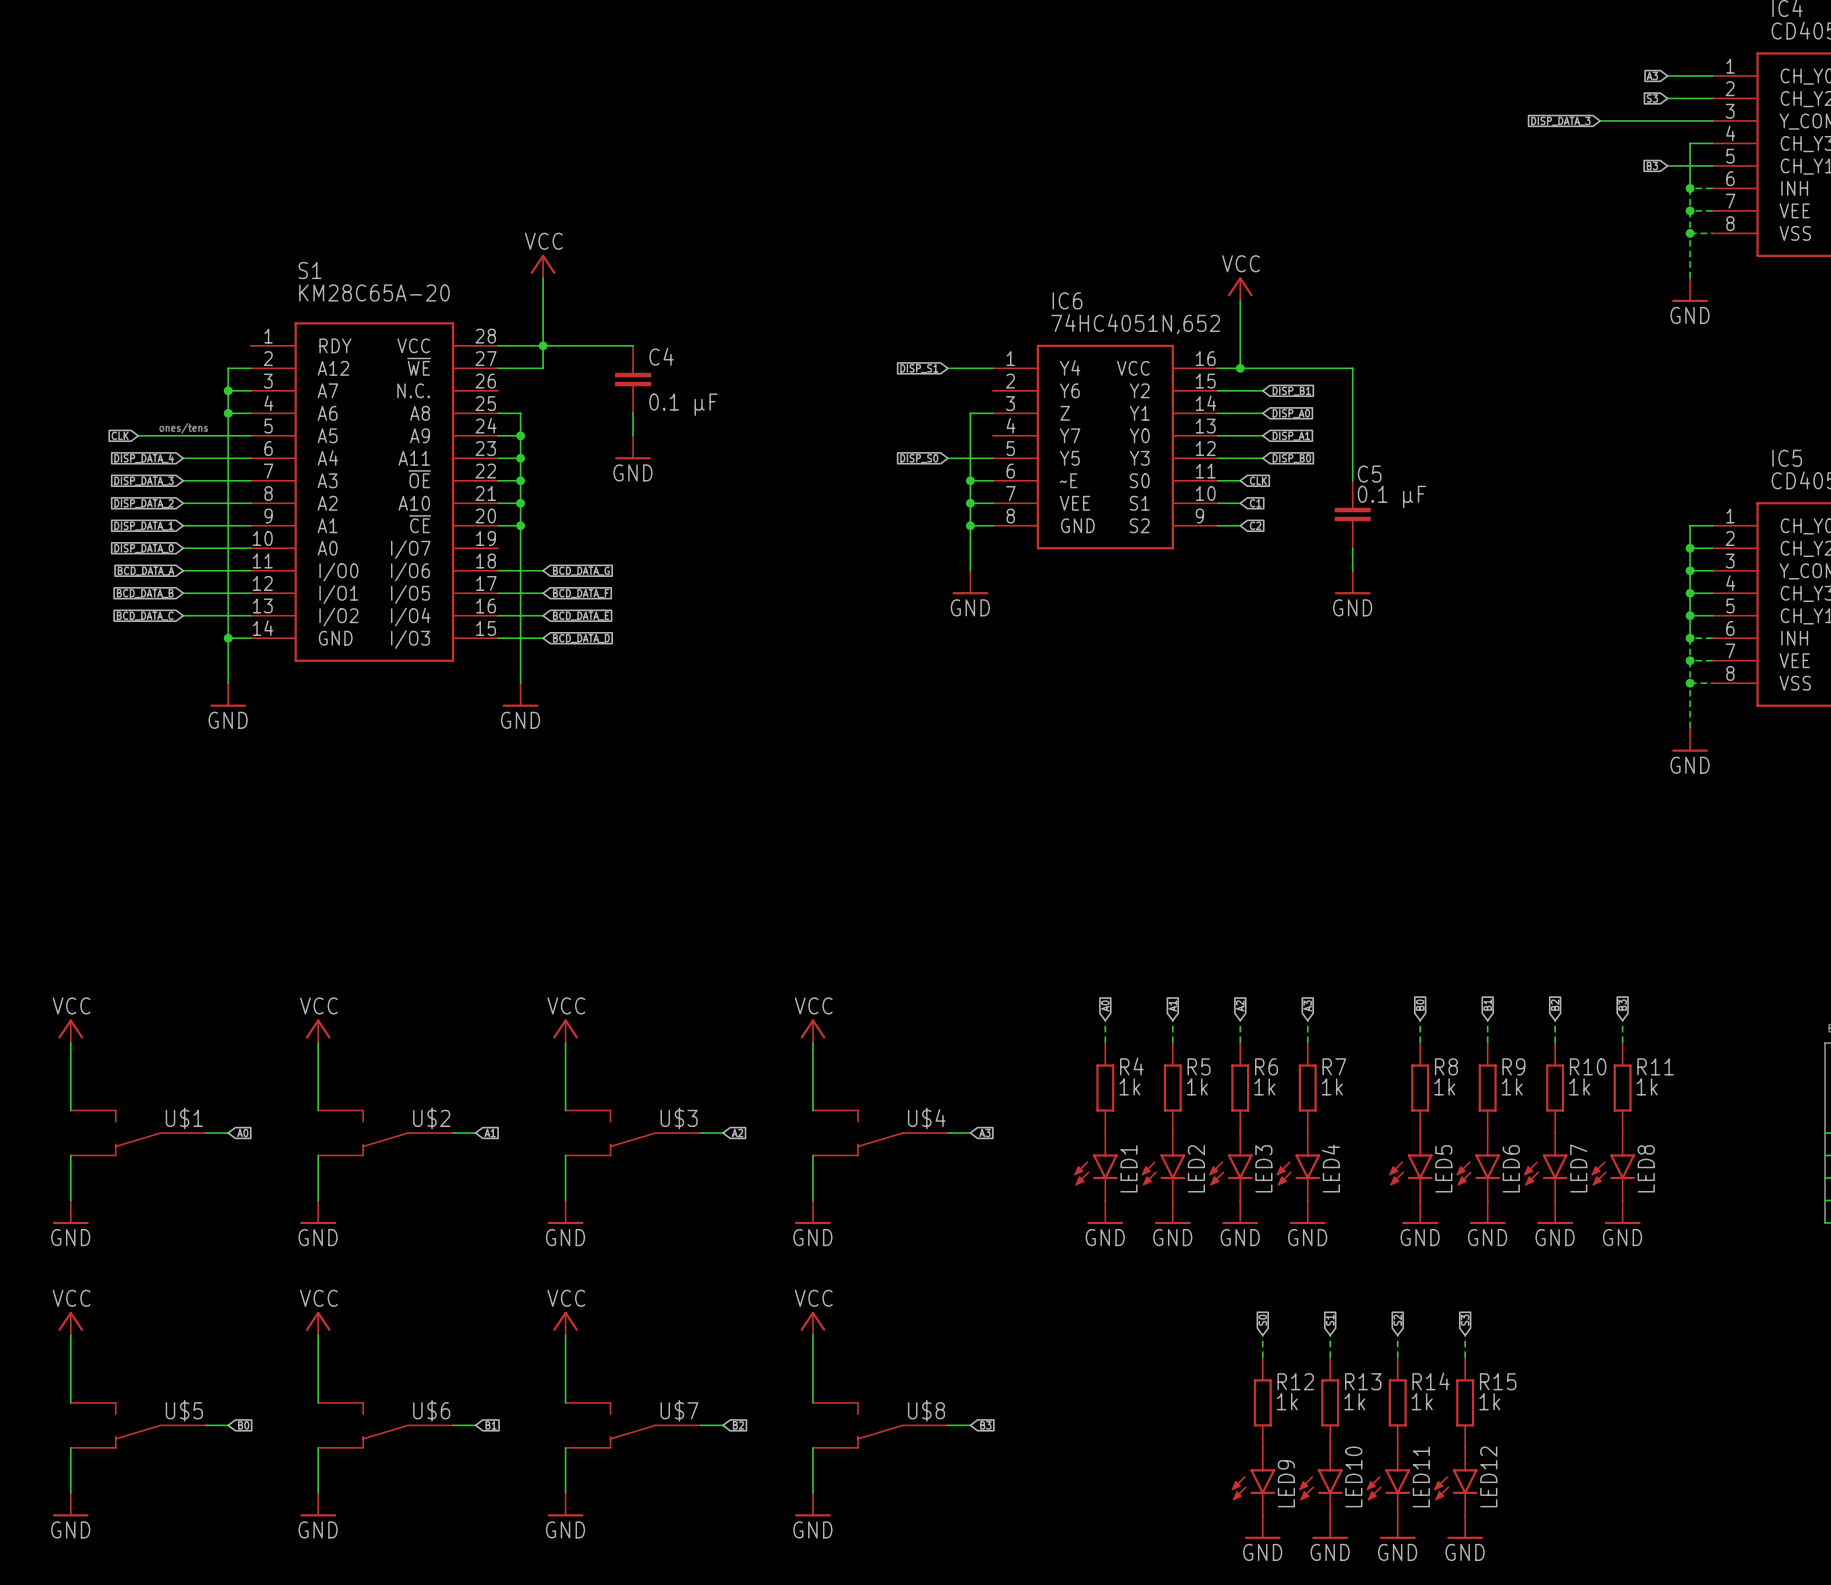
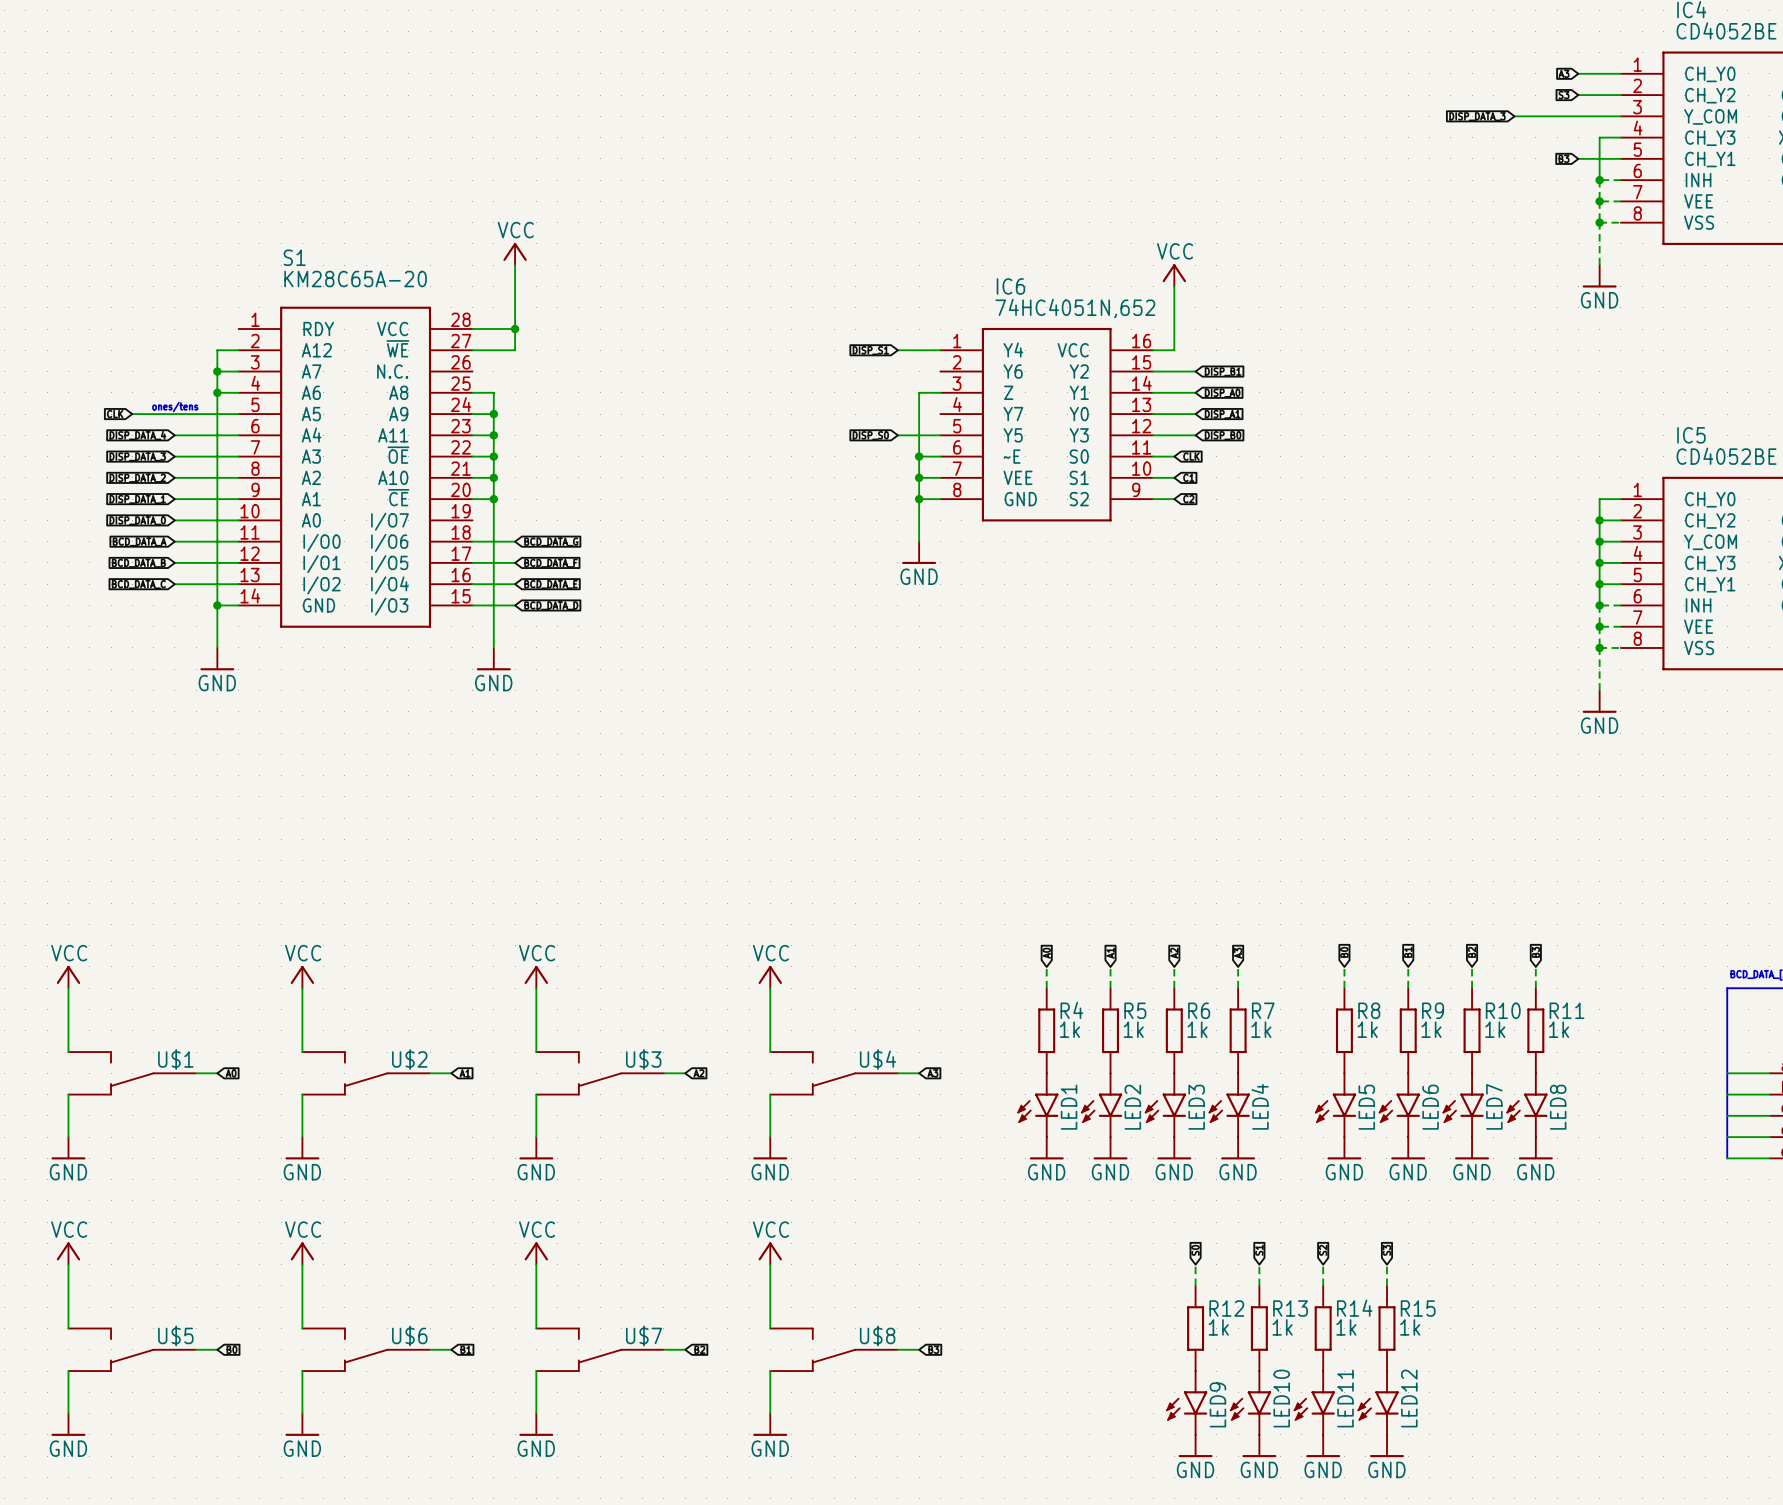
wire: (543, 345) (633, 345) -> none
wire: (1240, 368) (1352, 368) (1352, 480) -> none
junction: (1240, 368) -> none
C4: 0.1 µF (633, 379) -> none
wire: (633, 413) (633, 435) -> none
power symbol: GND (633, 447) -> none
C5: 0.1 µF (1352, 514) -> none
wire: (1352, 548) (1352, 570) -> none
power symbol: GND (1352, 582) -> none

